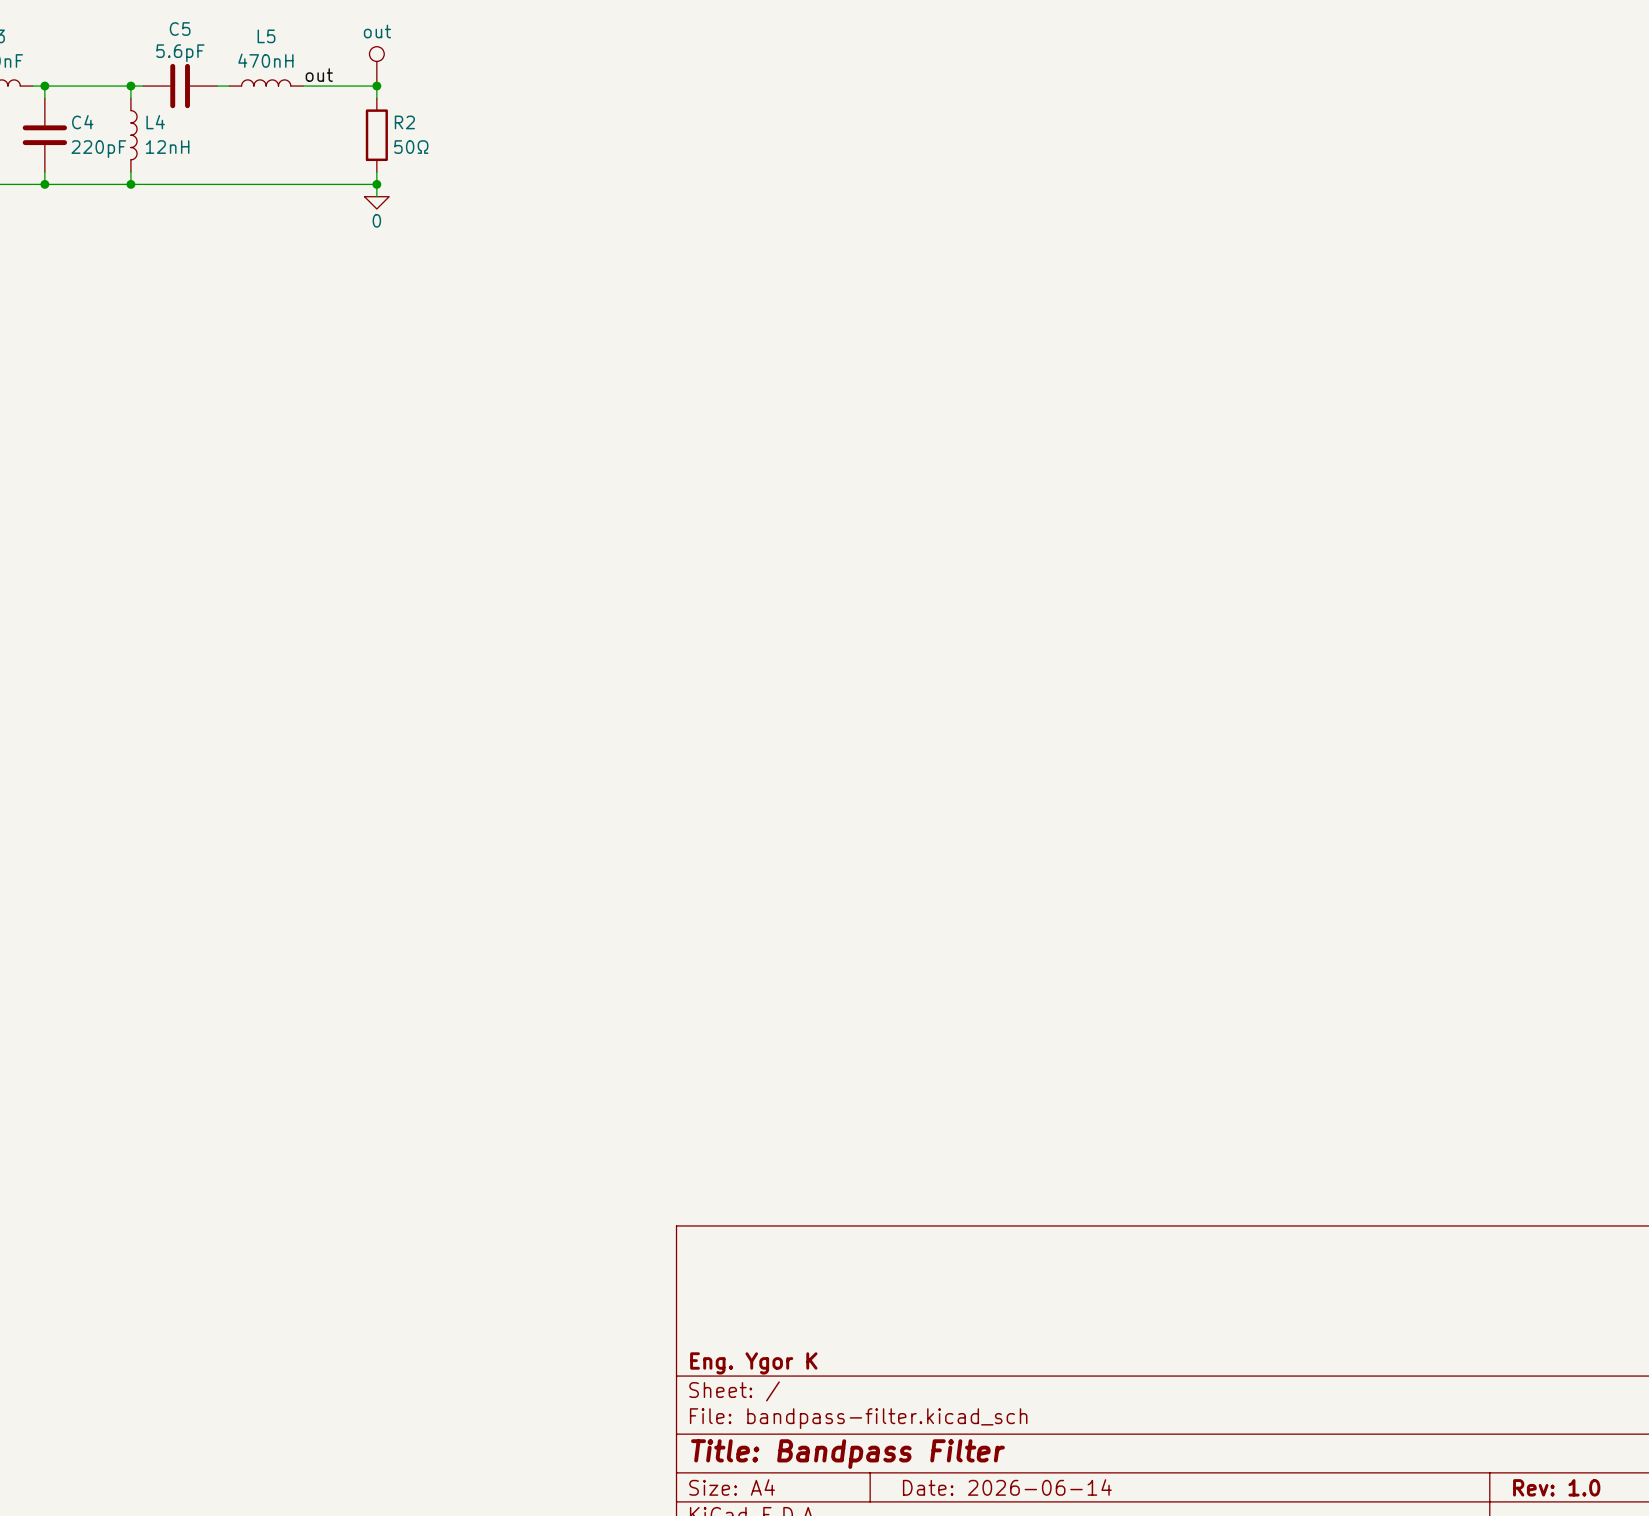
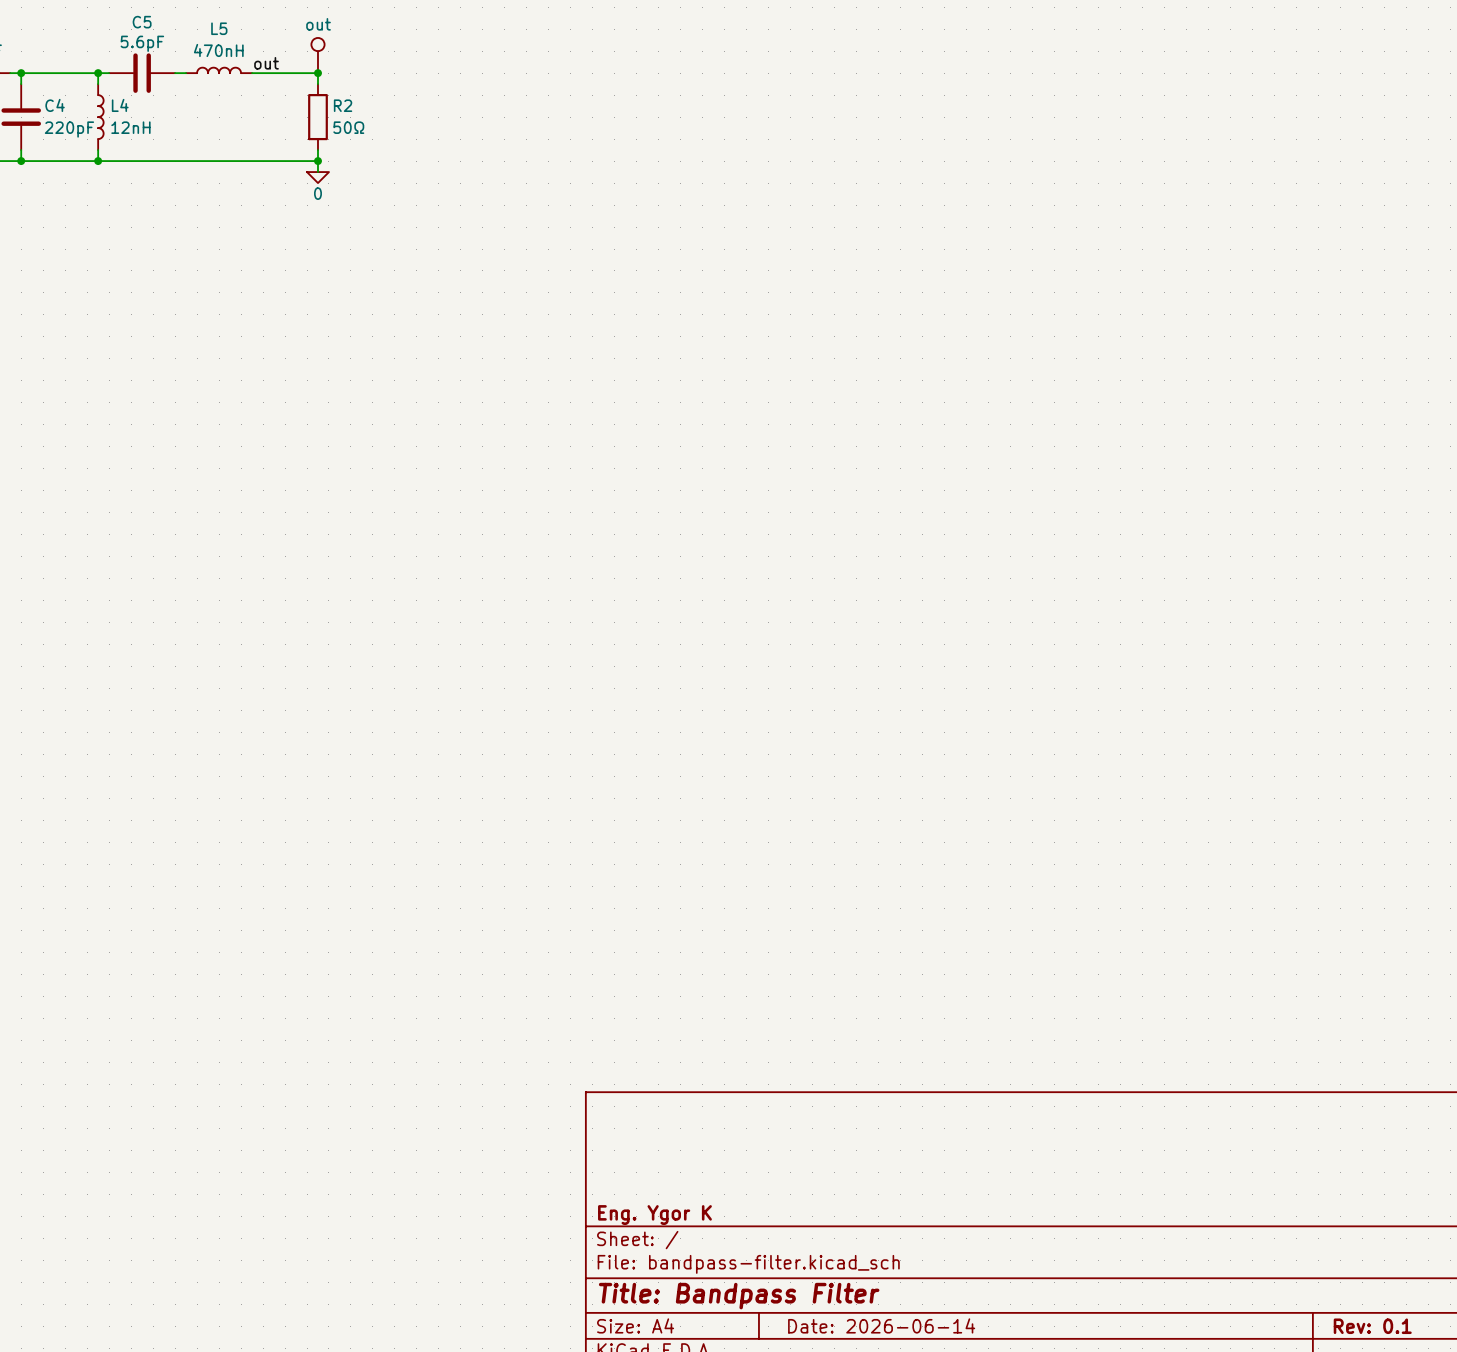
title block: Rev: 1.0 (1556, 1487) -> Rev: 0.1 (1372, 1326)

